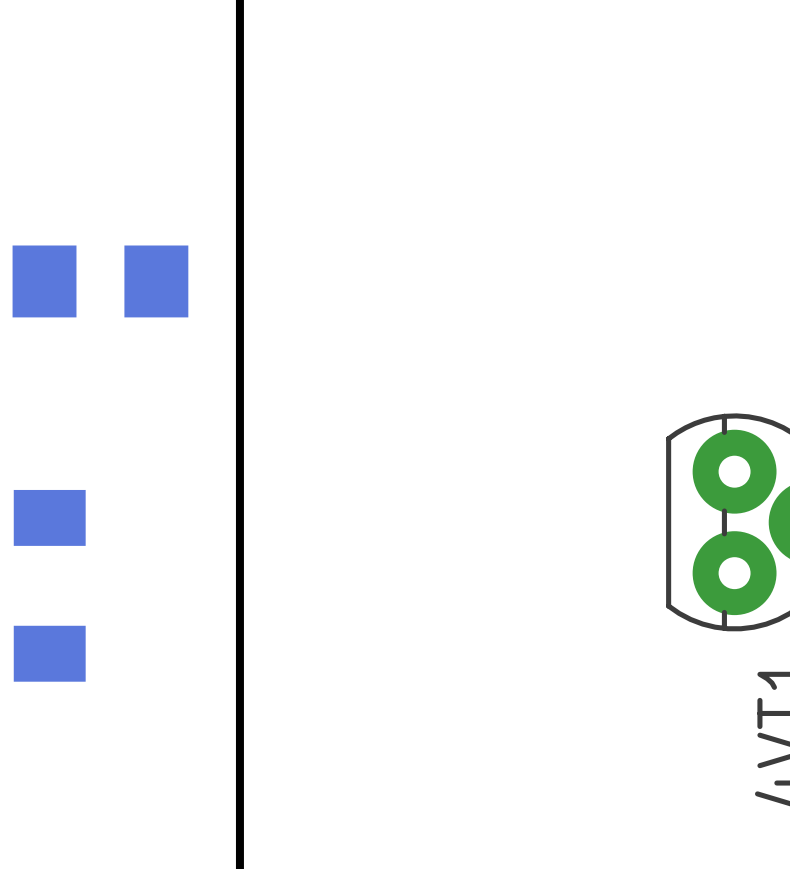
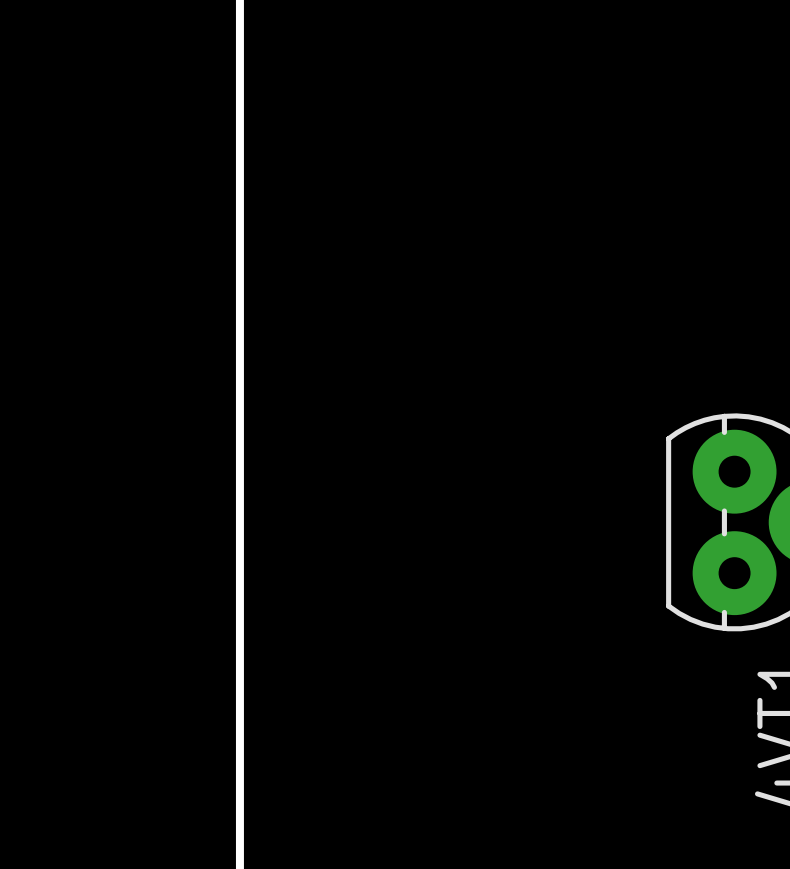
part: (100, 281) -> none
part: (49, 585) -> none

